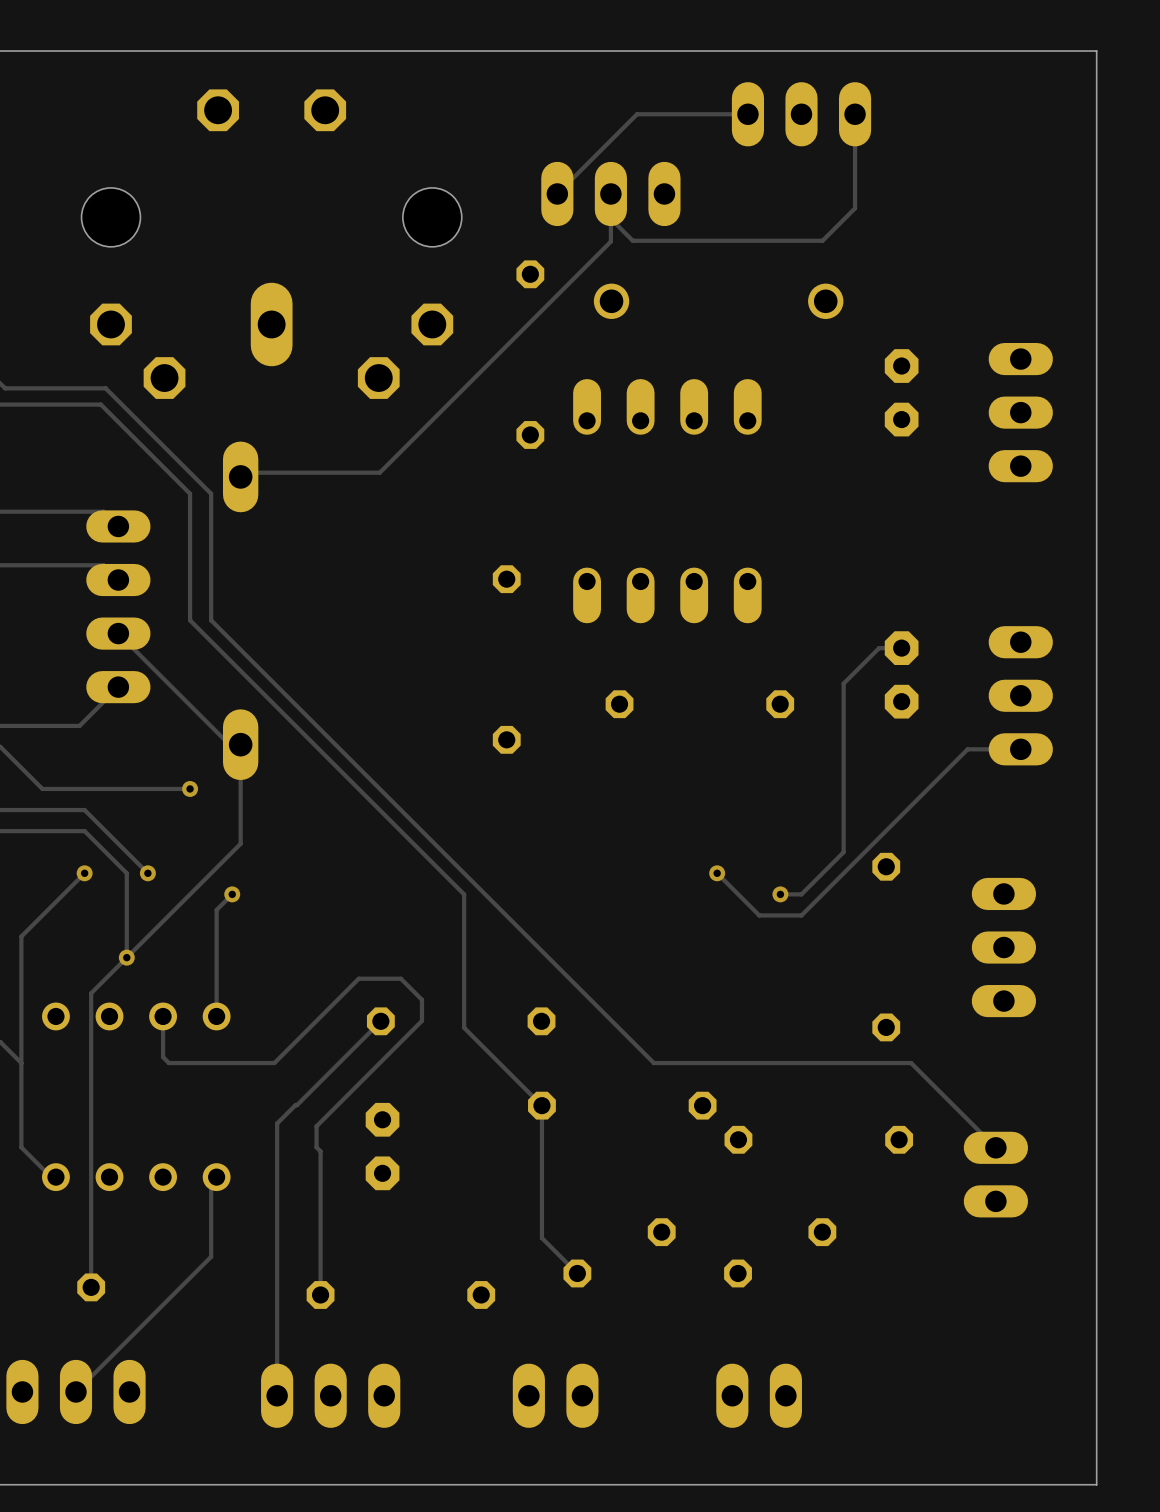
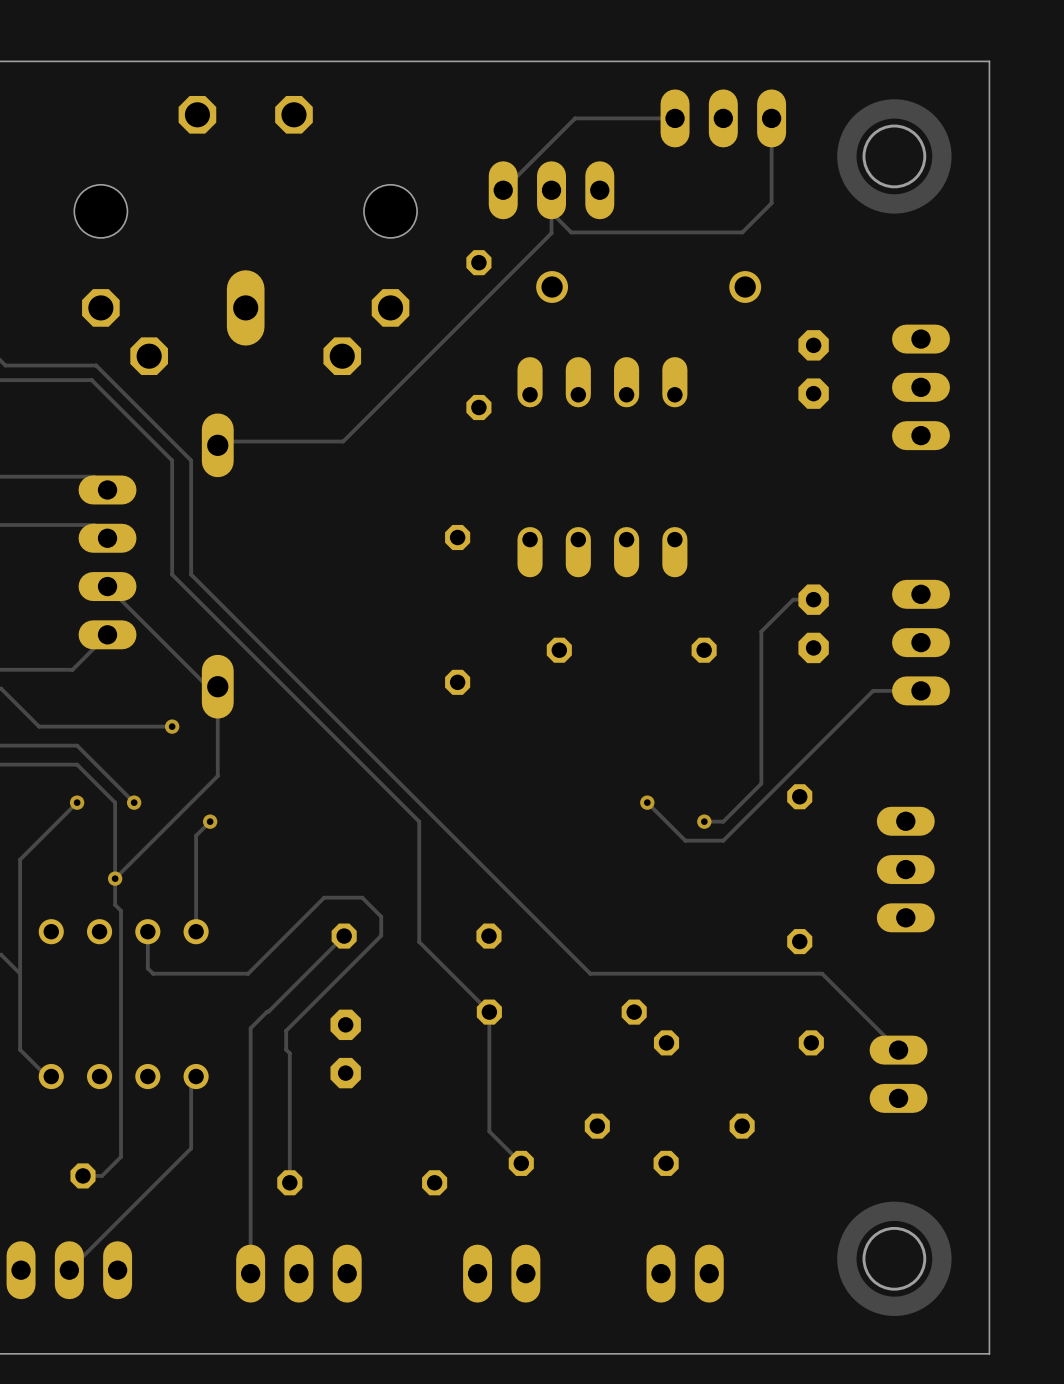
drawing: none -> [837, 99, 952, 214]
round board edge: none -> [862, 124, 927, 189]
track: (126, 957) (91, 993) (91, 1287) -> (115, 878) (115, 904) (121, 910) (121, 1156) (102, 1175) (83, 1175)
drawing: none -> [837, 1201, 952, 1316]
round board edge: none -> [862, 1226, 927, 1291]

